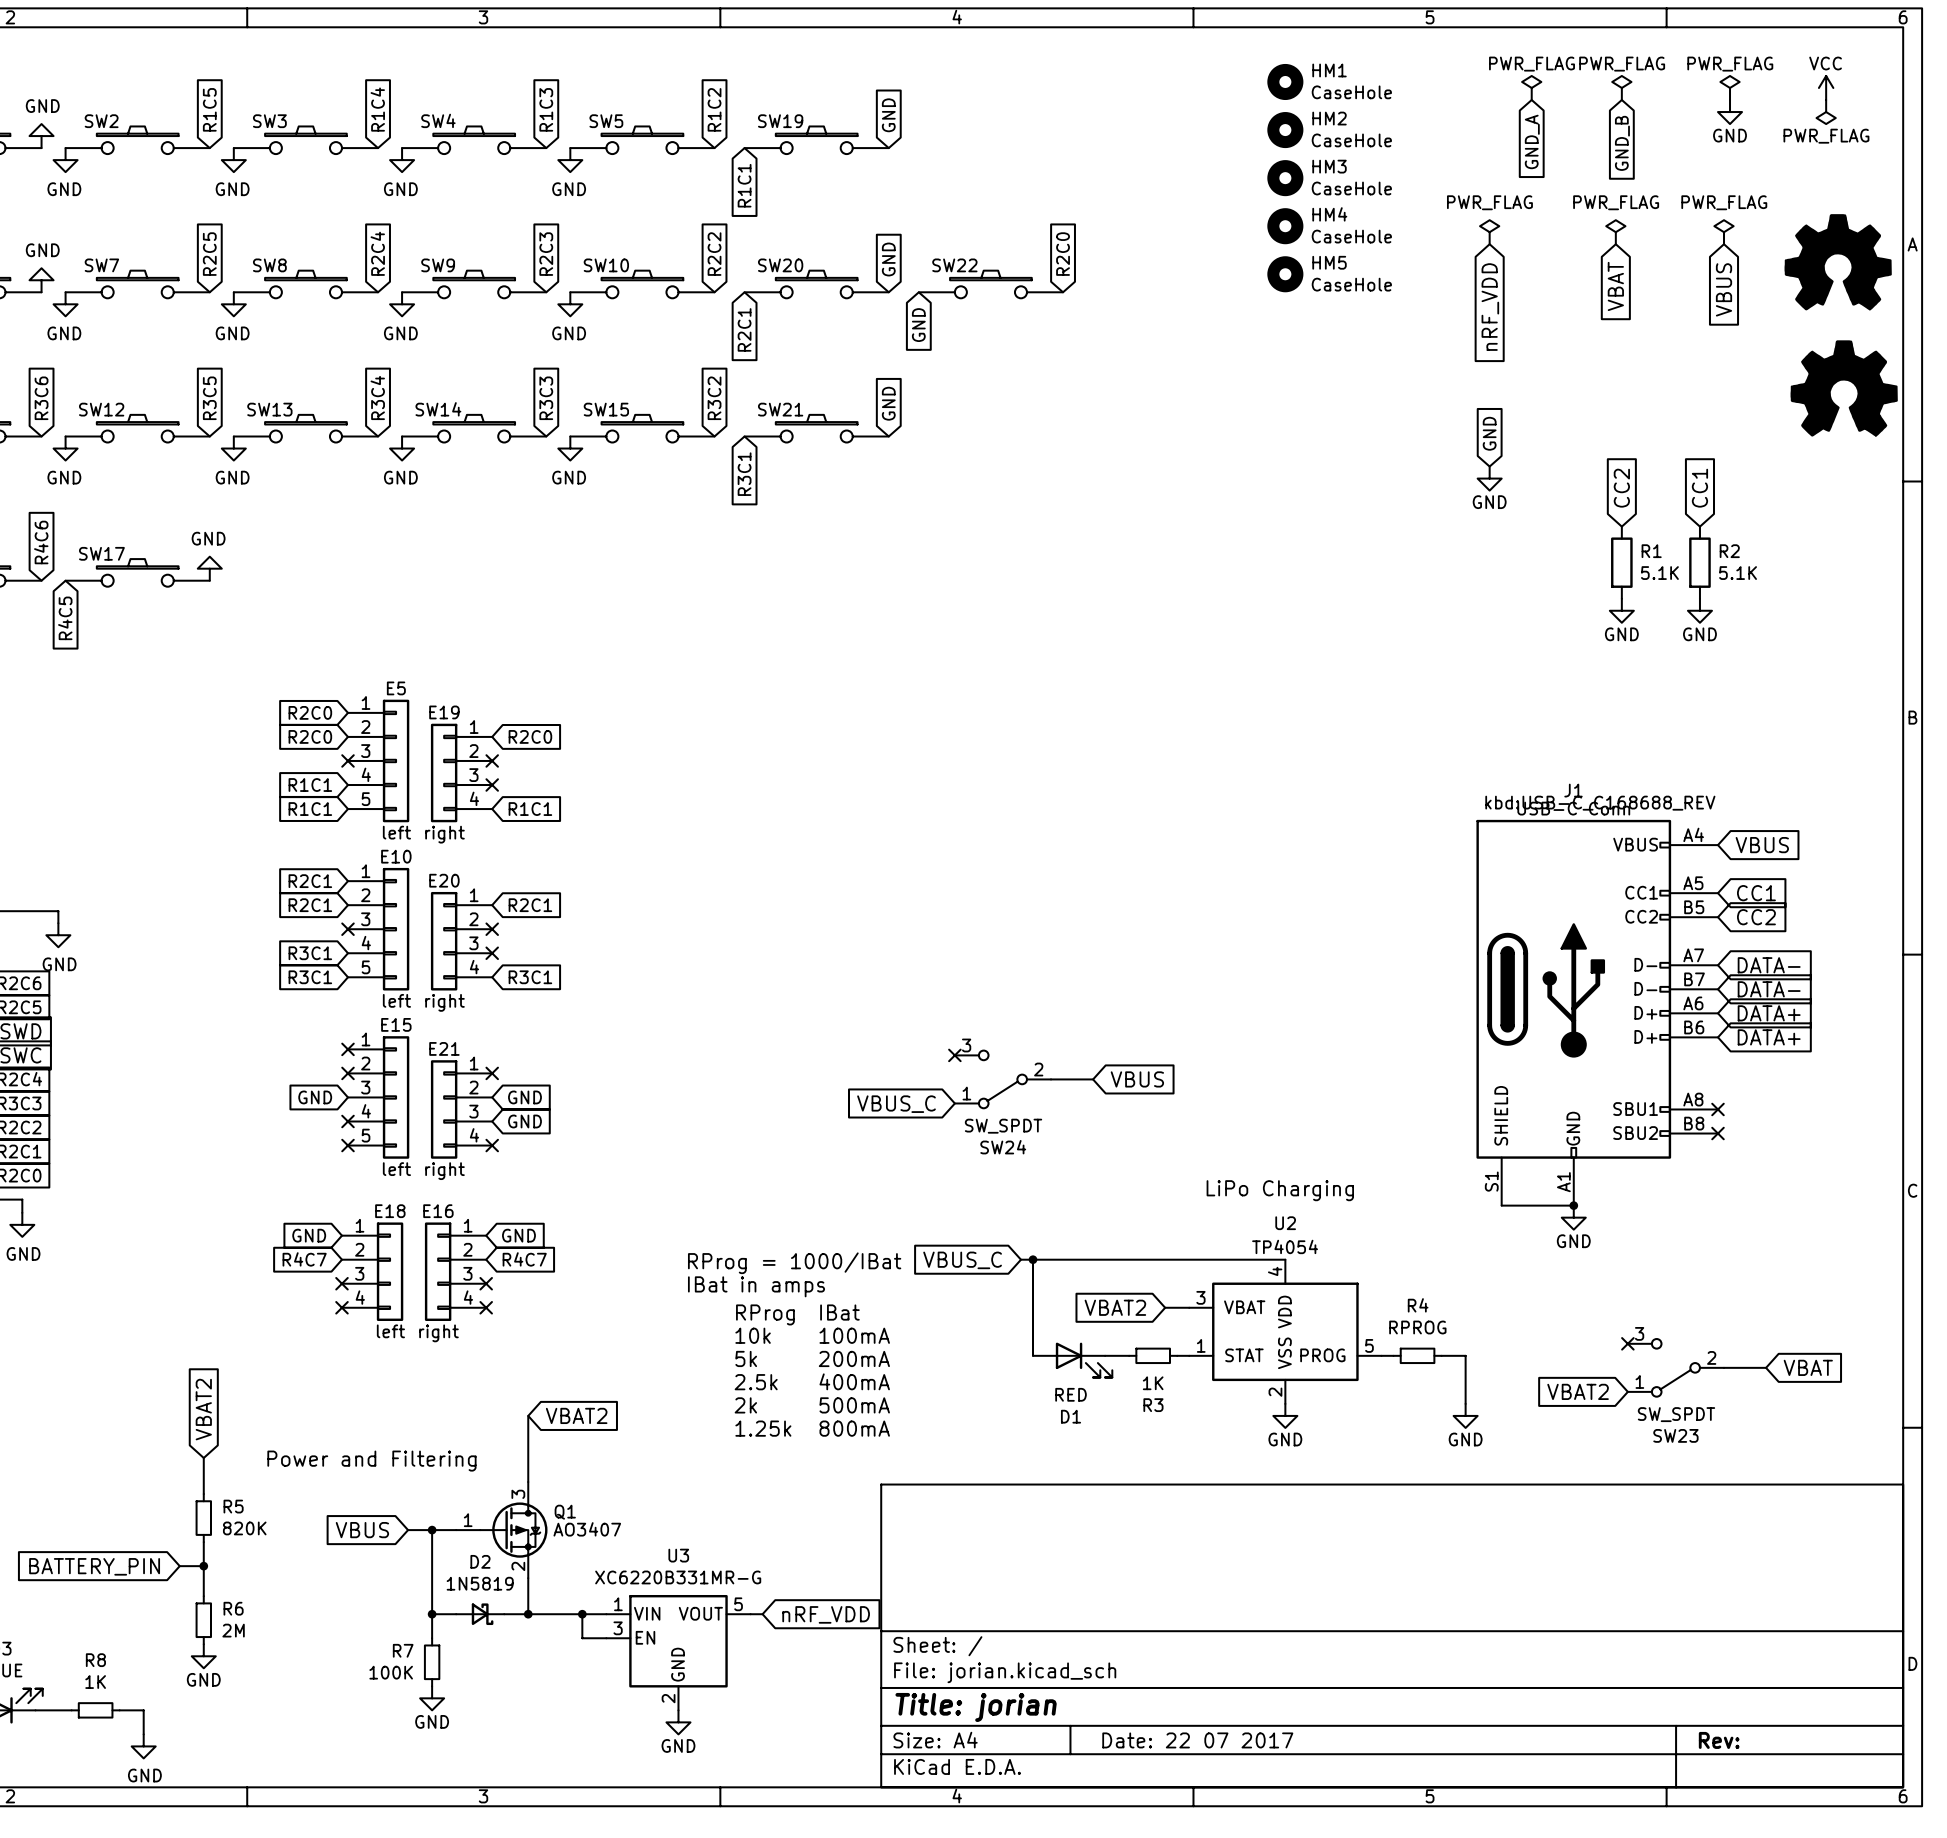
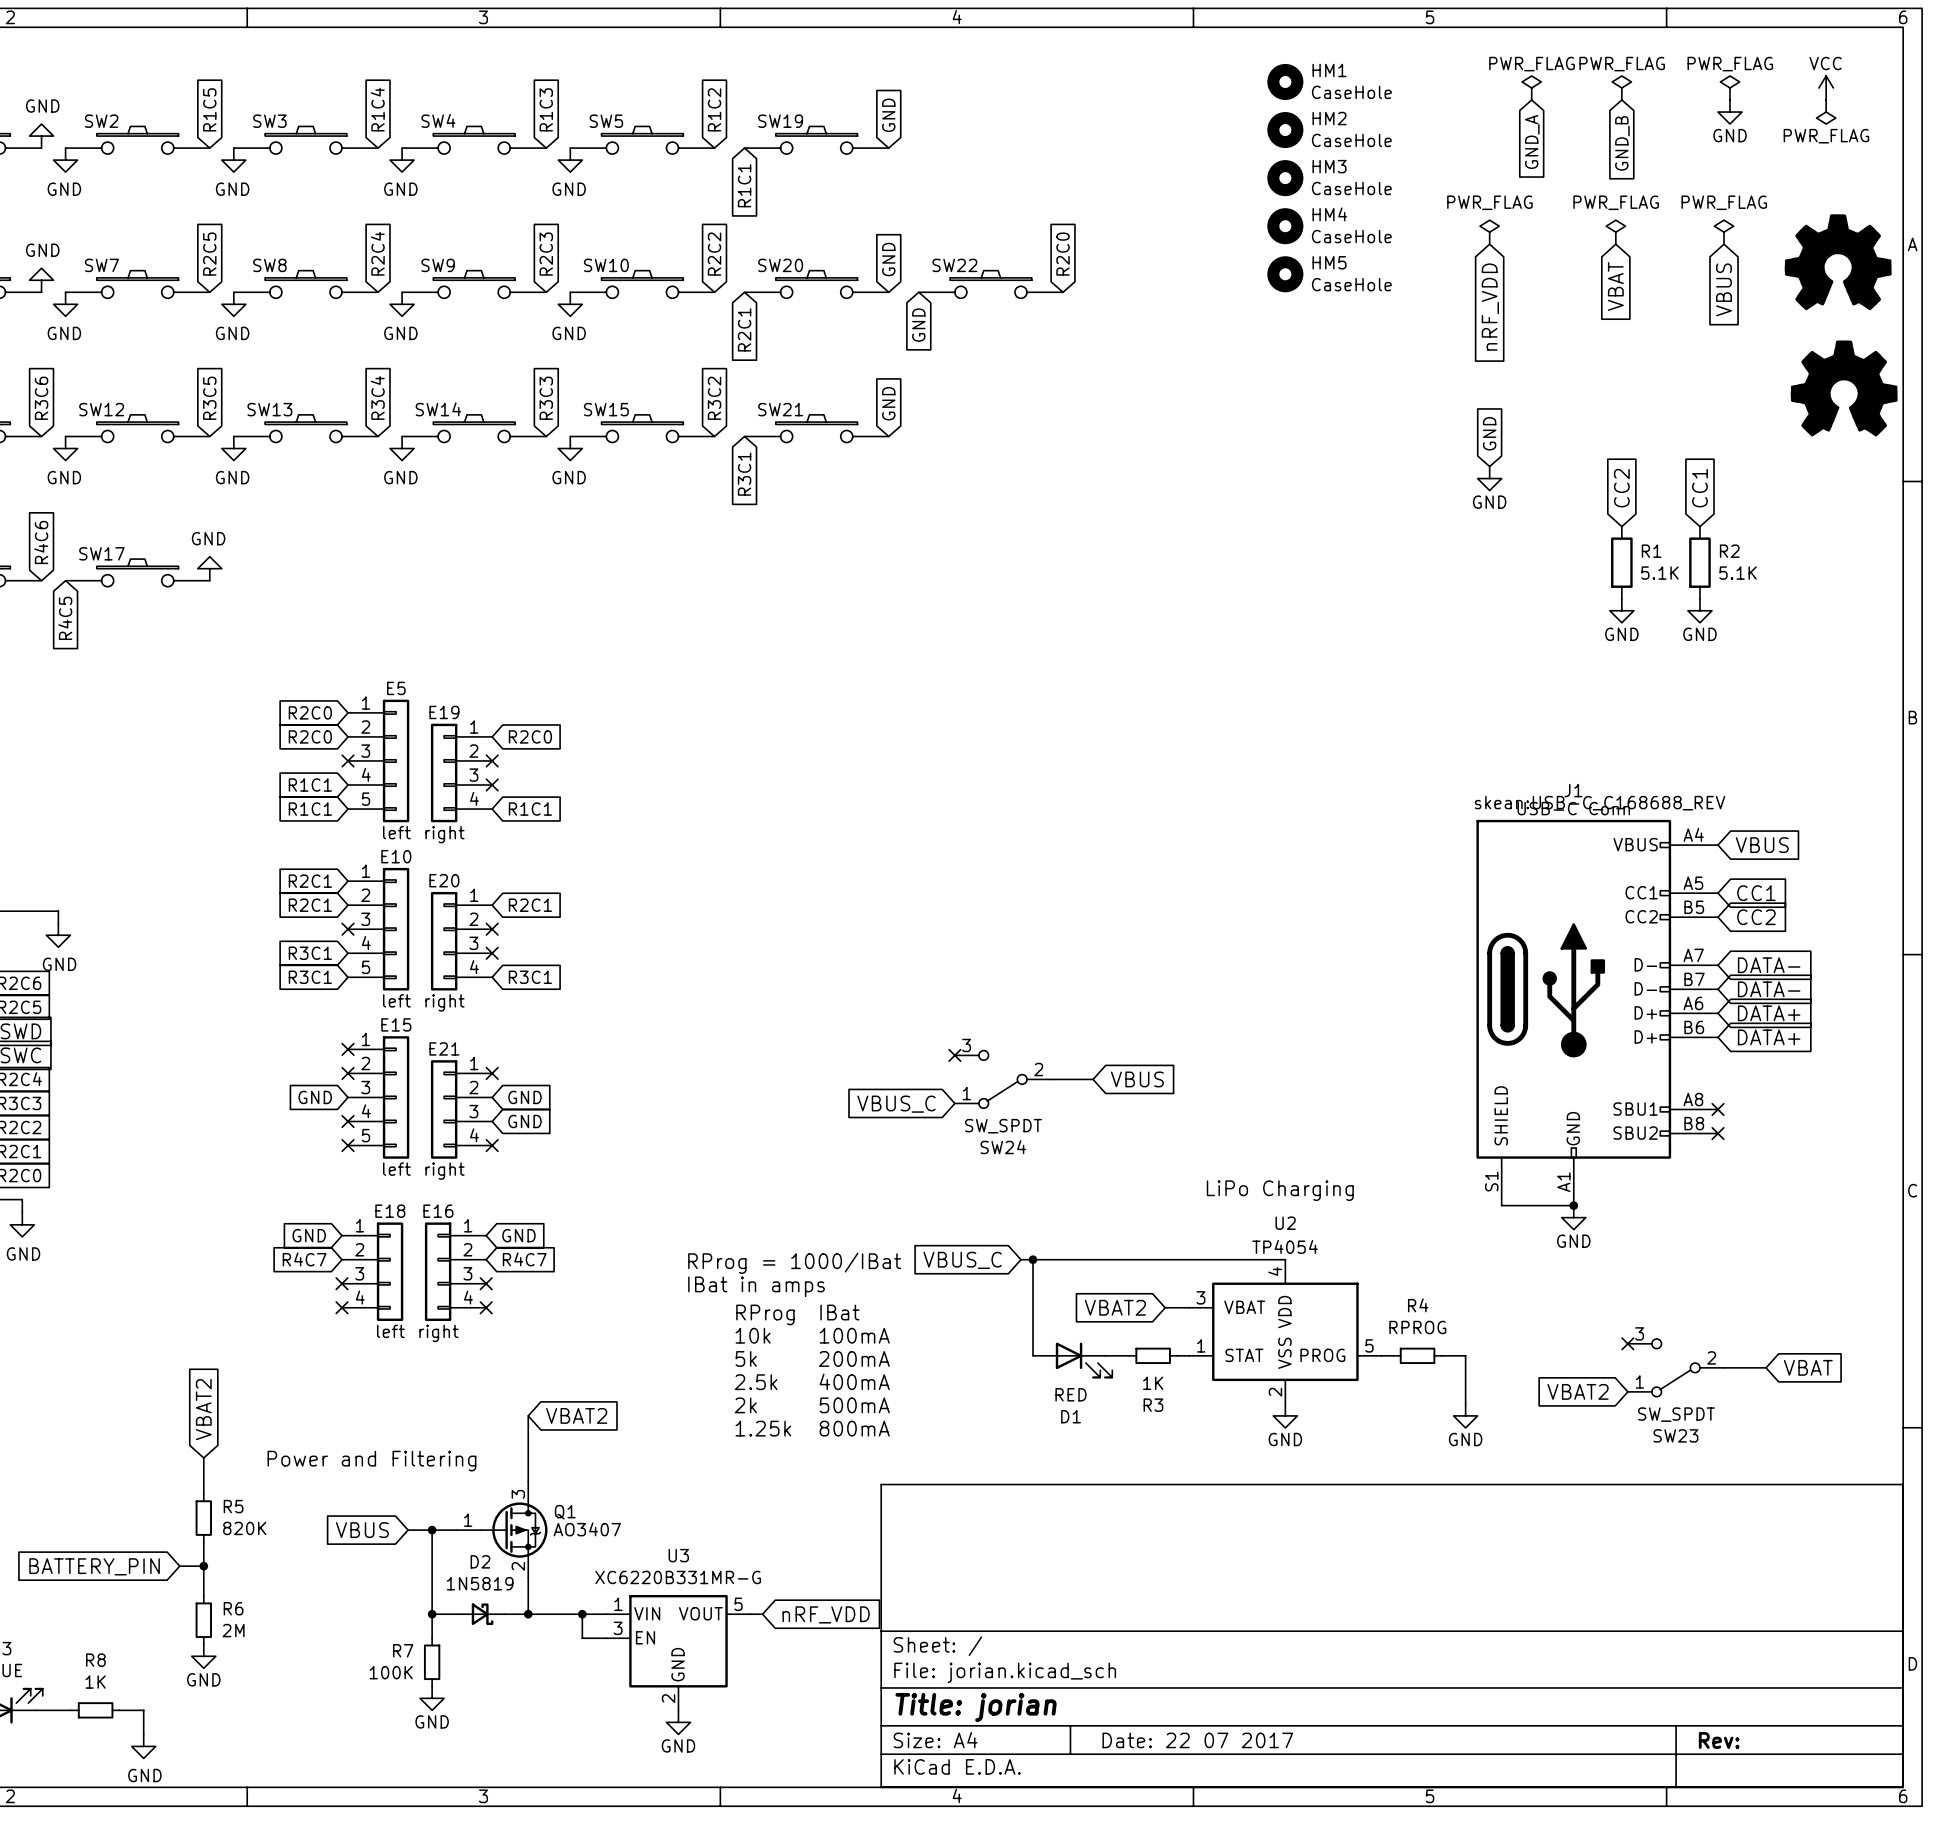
J1 text: kbd:USB-C_C168688_REV (1600, 803) -> skean:USB-C_C168688_REV (1600, 803)

